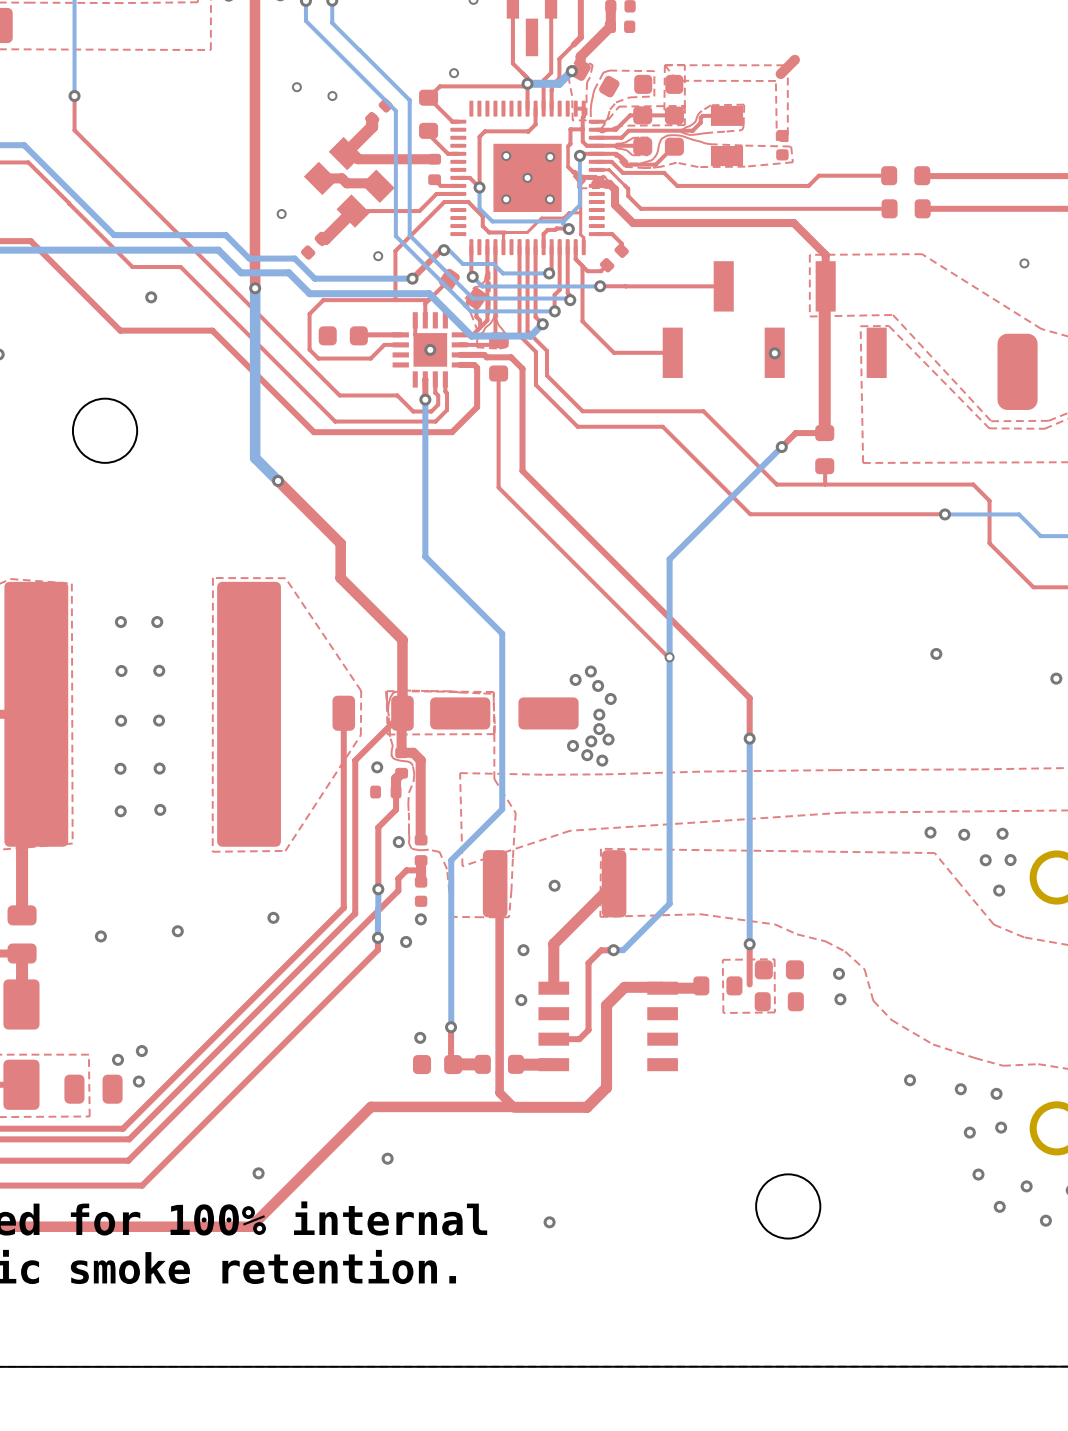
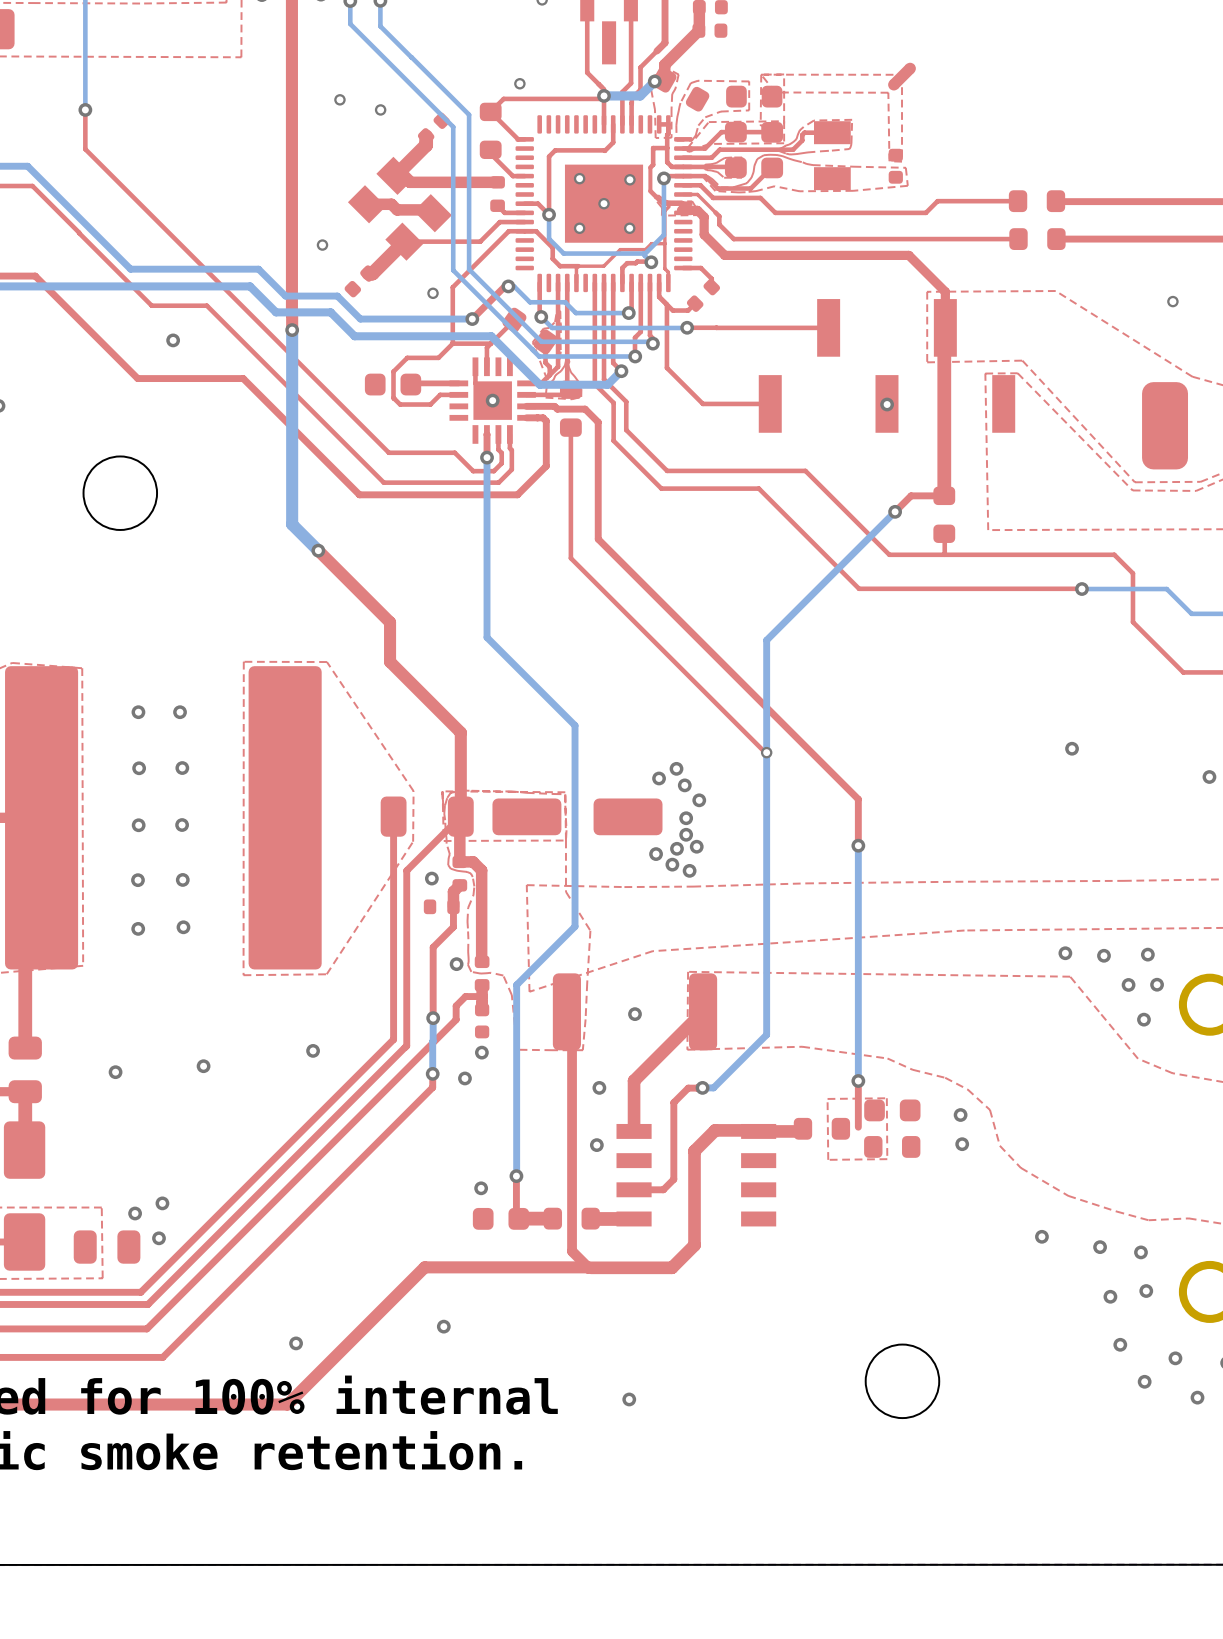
top track: (395, 300) (323, 300) (309, 313) (309, 349) (318, 358) (370, 358) (375, 353) -> (452, 343) (438, 357) (407, 357) (393, 371) (394, 398)
top track: none -> (394, 398) (400, 404) (430, 404)

